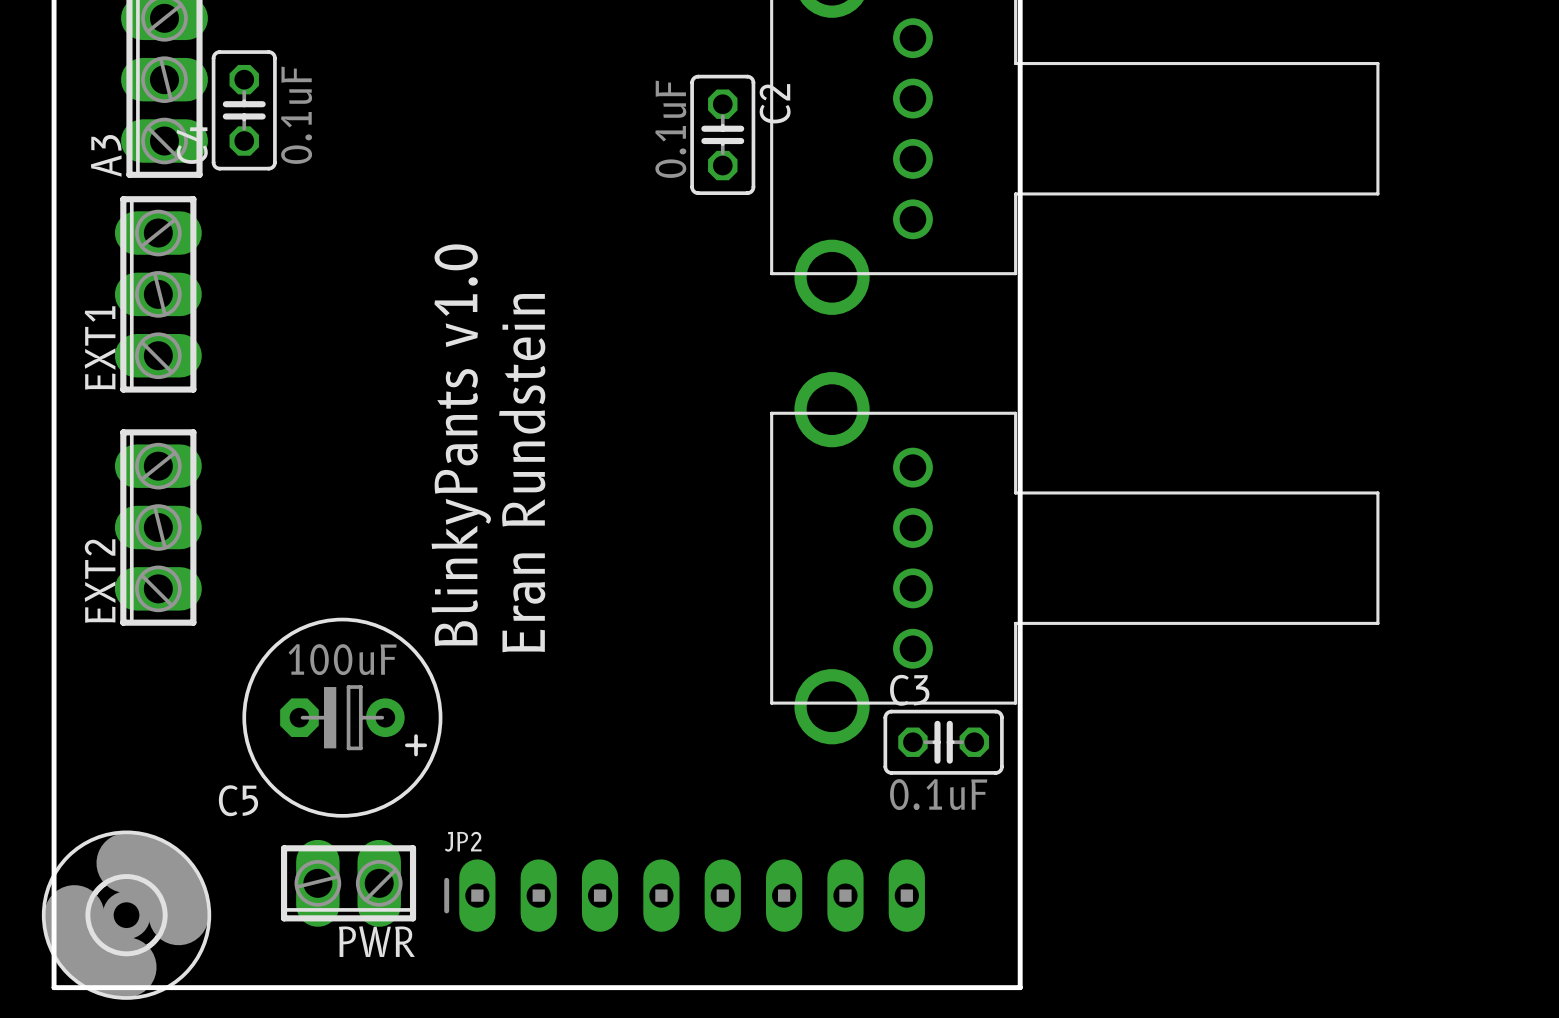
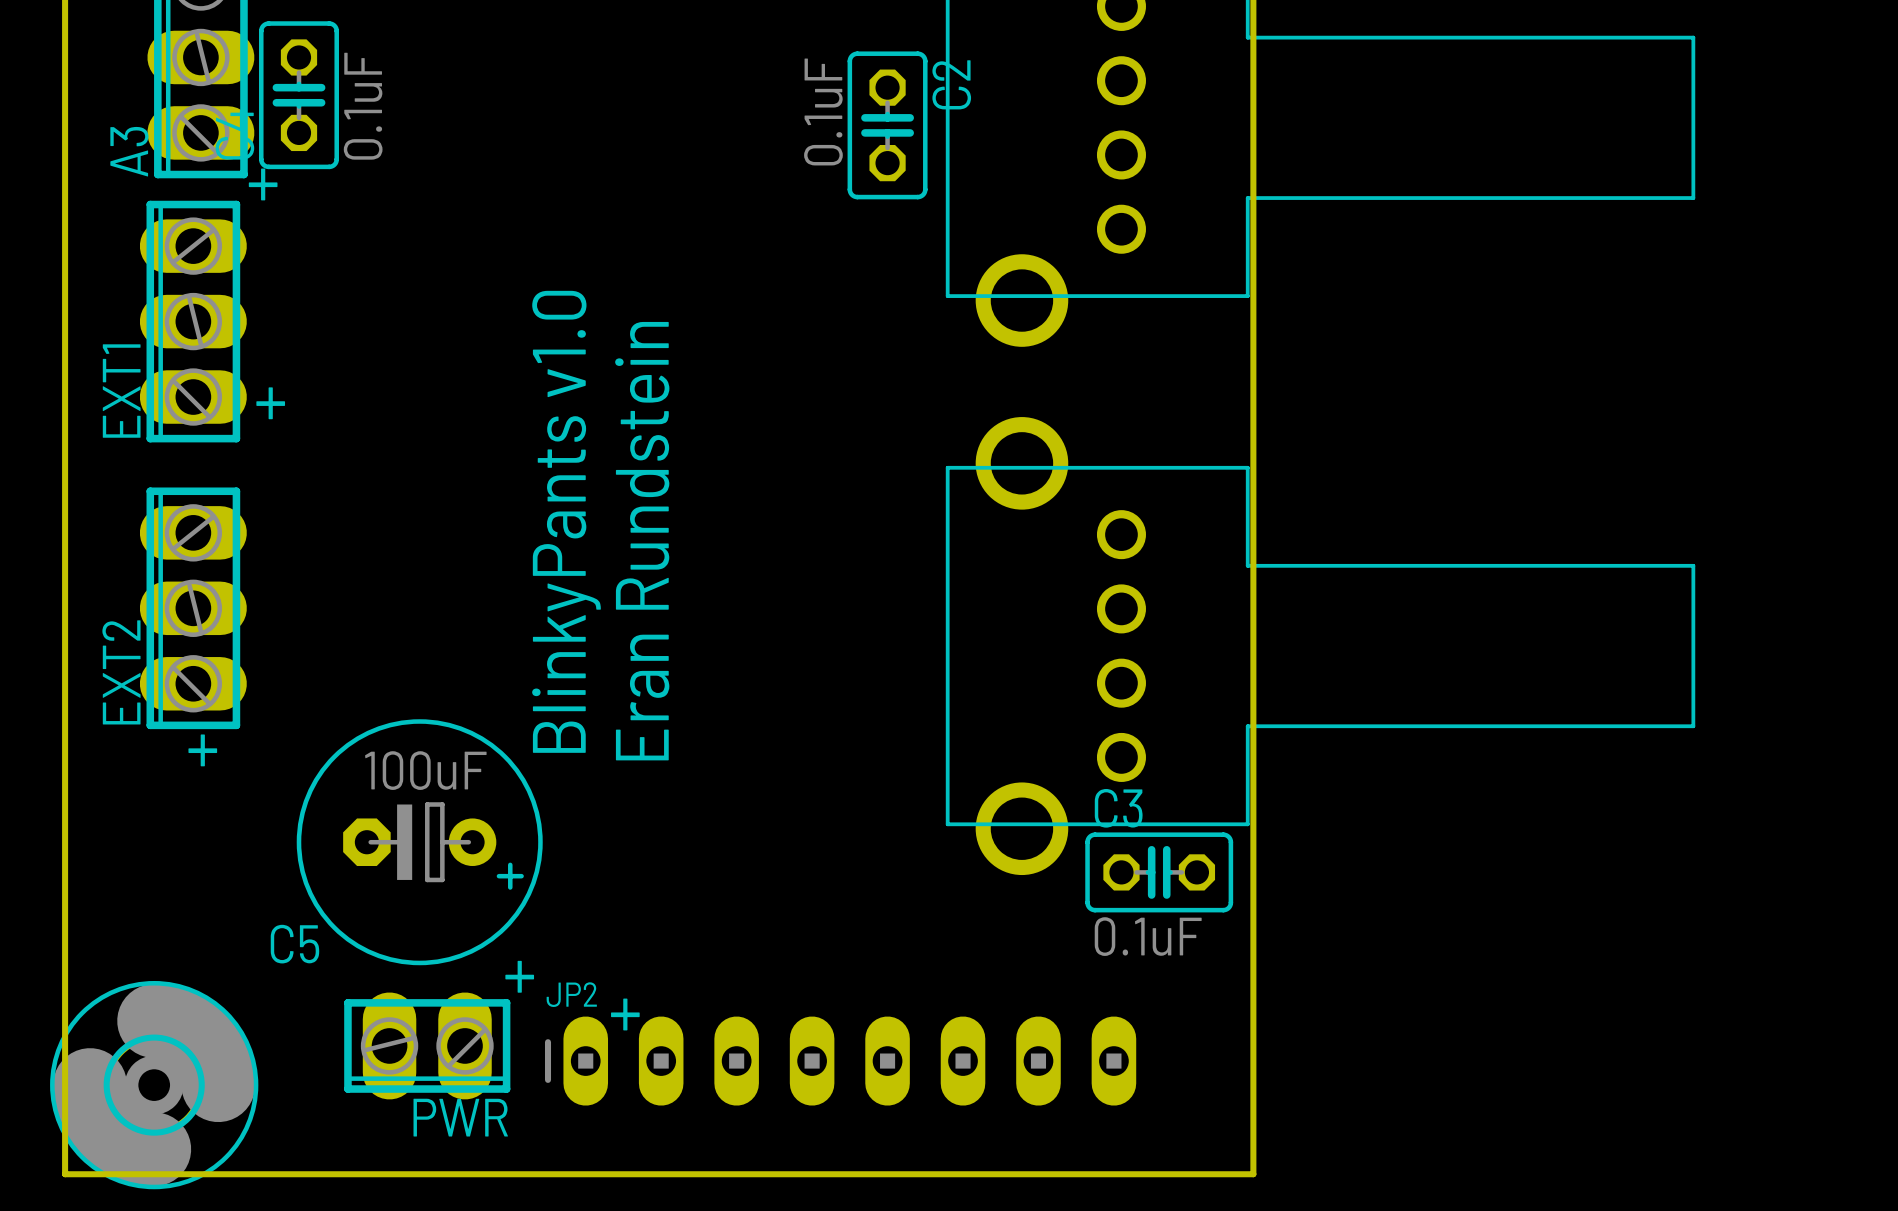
text: none -> + (263, 184)
text: none -> + (270, 403)
text: none -> + (202, 750)
text: none -> + (519, 976)
text: none -> + (625, 1014)

